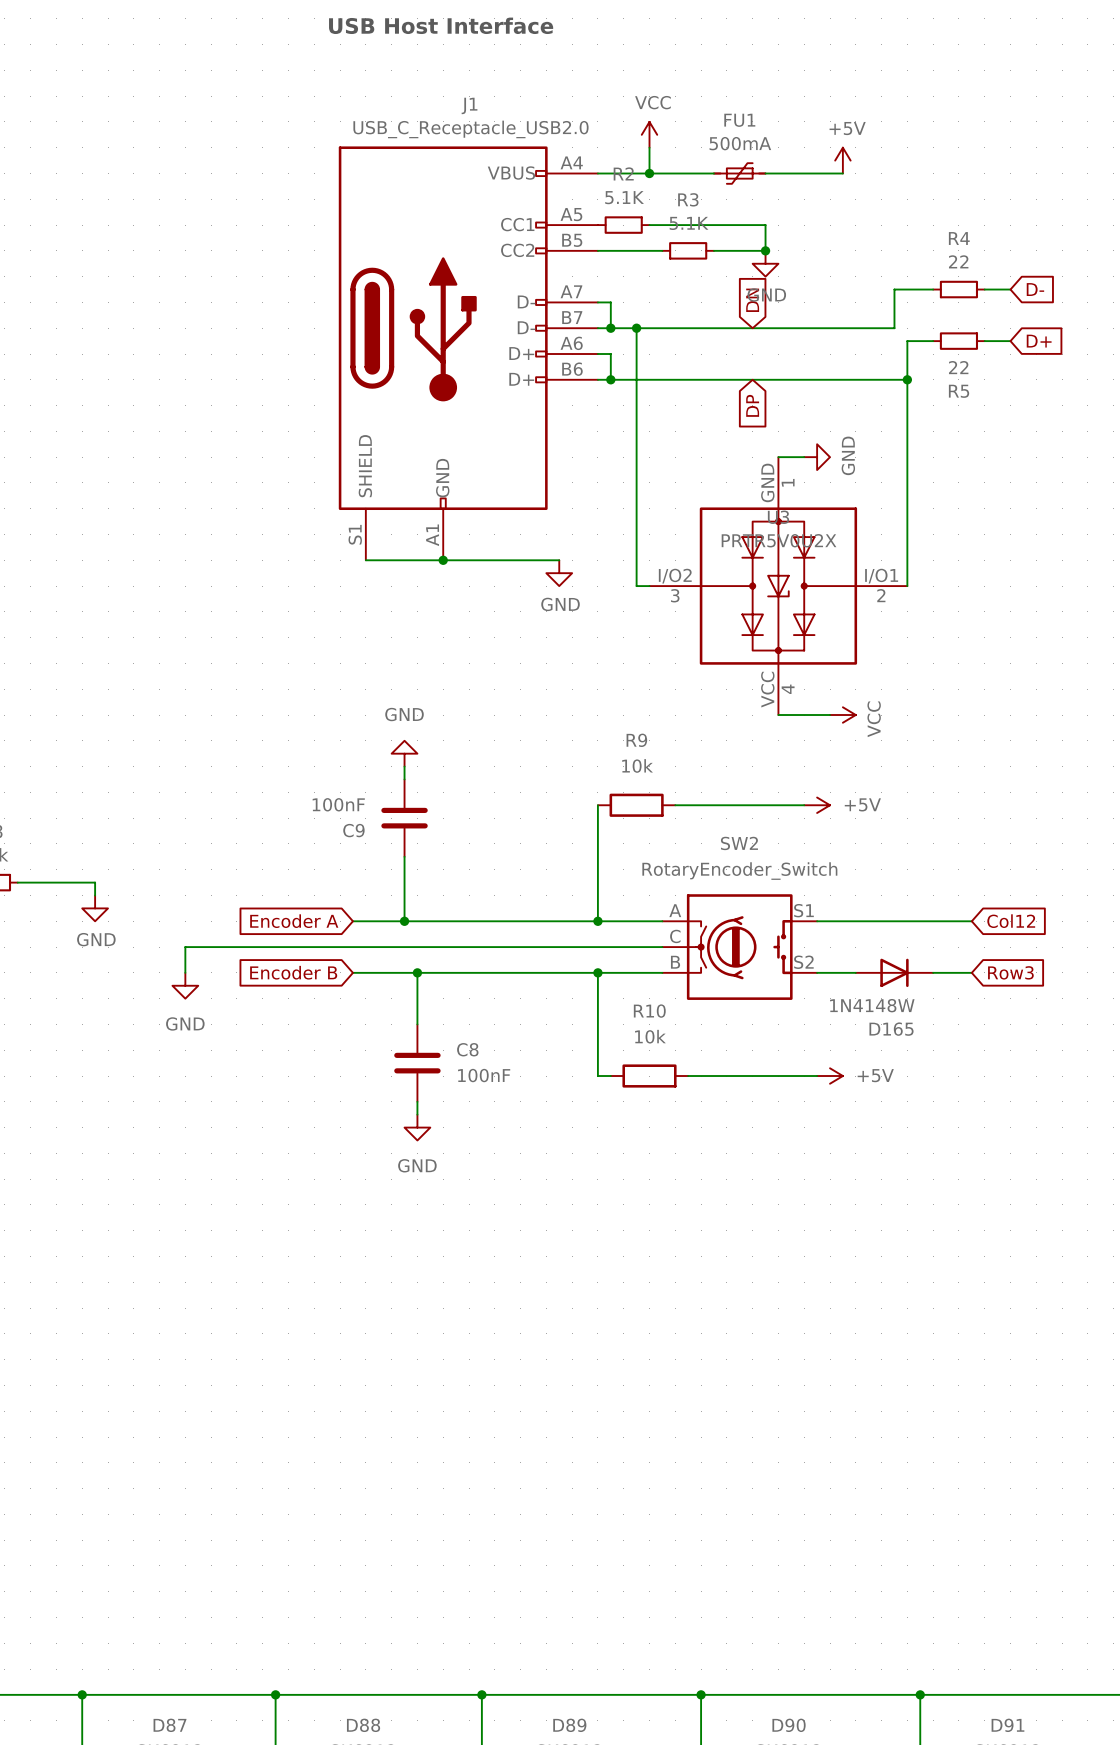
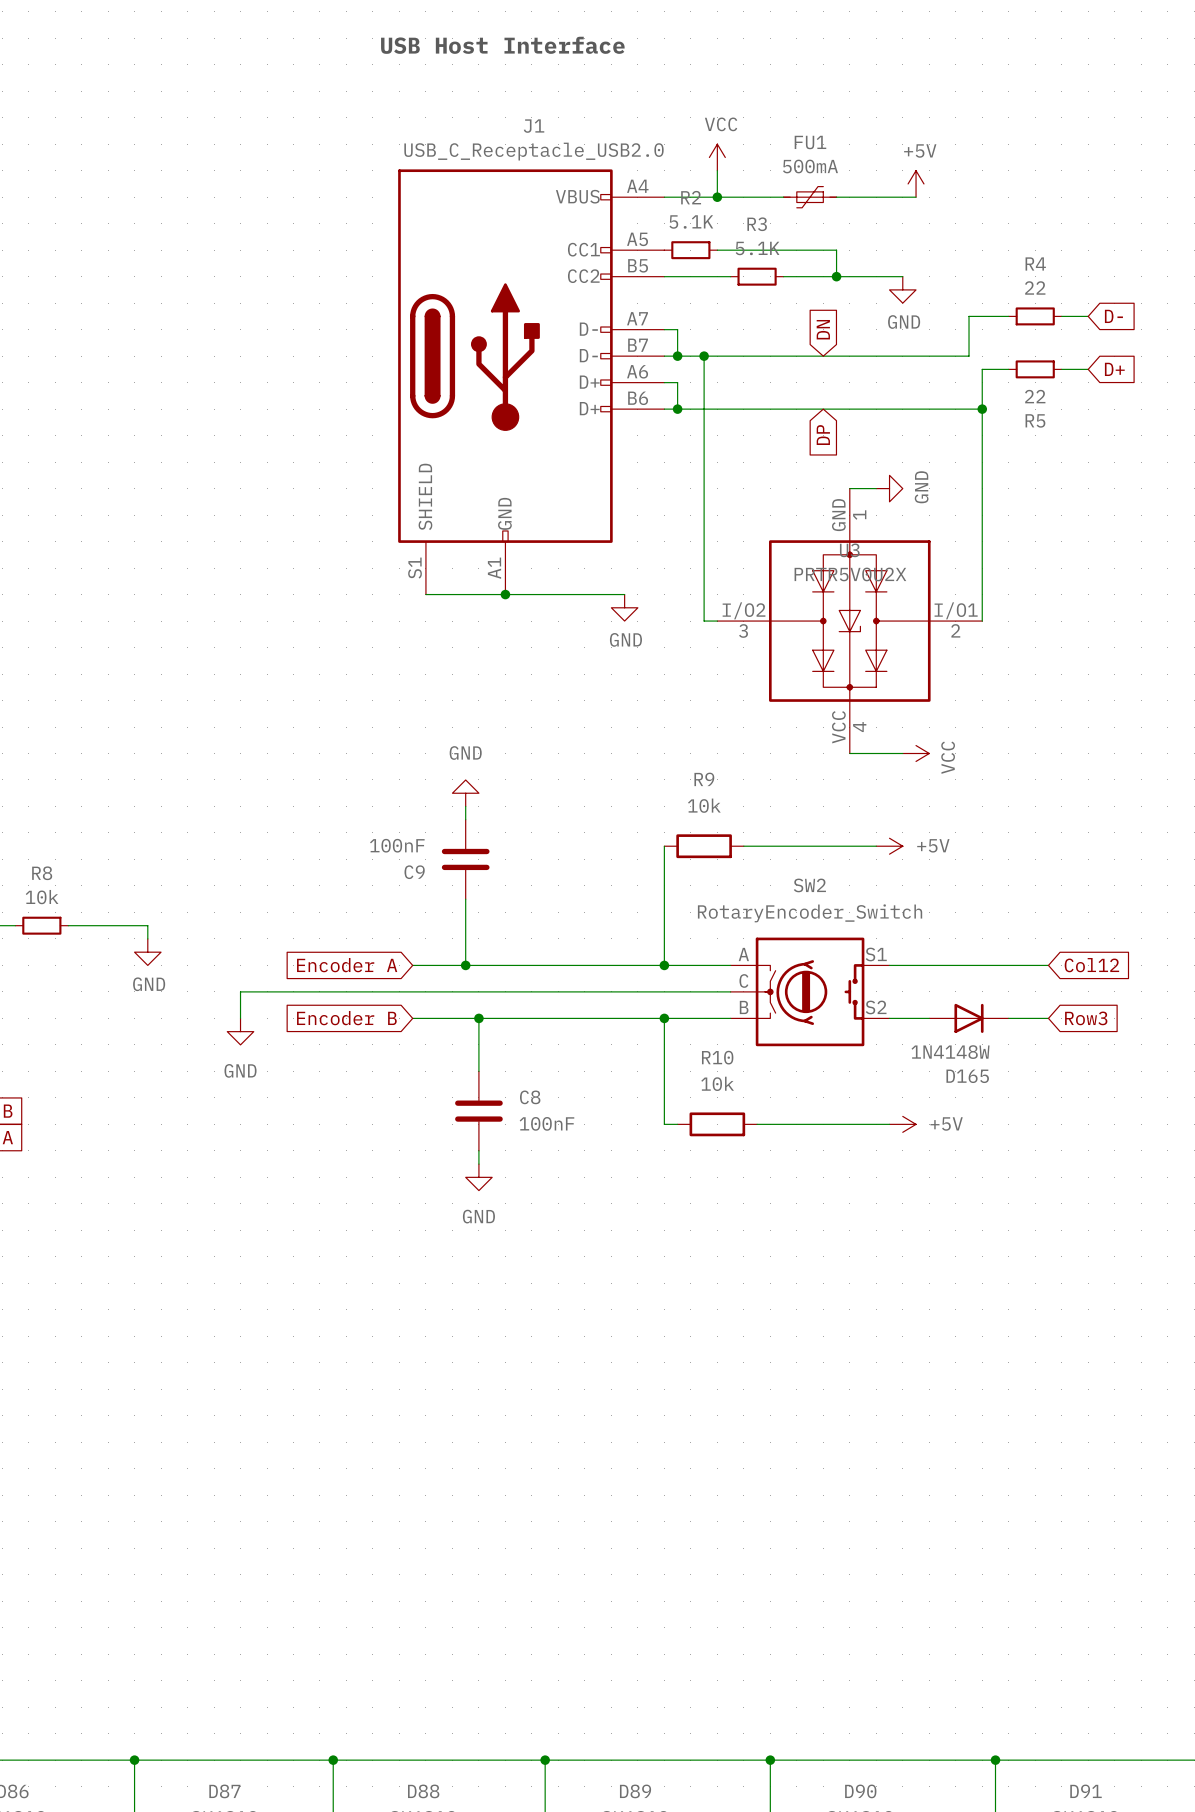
wire: none -> (836, 276) (902, 276)
power symbol position: GND (765, 263) -> GND (902, 289)

